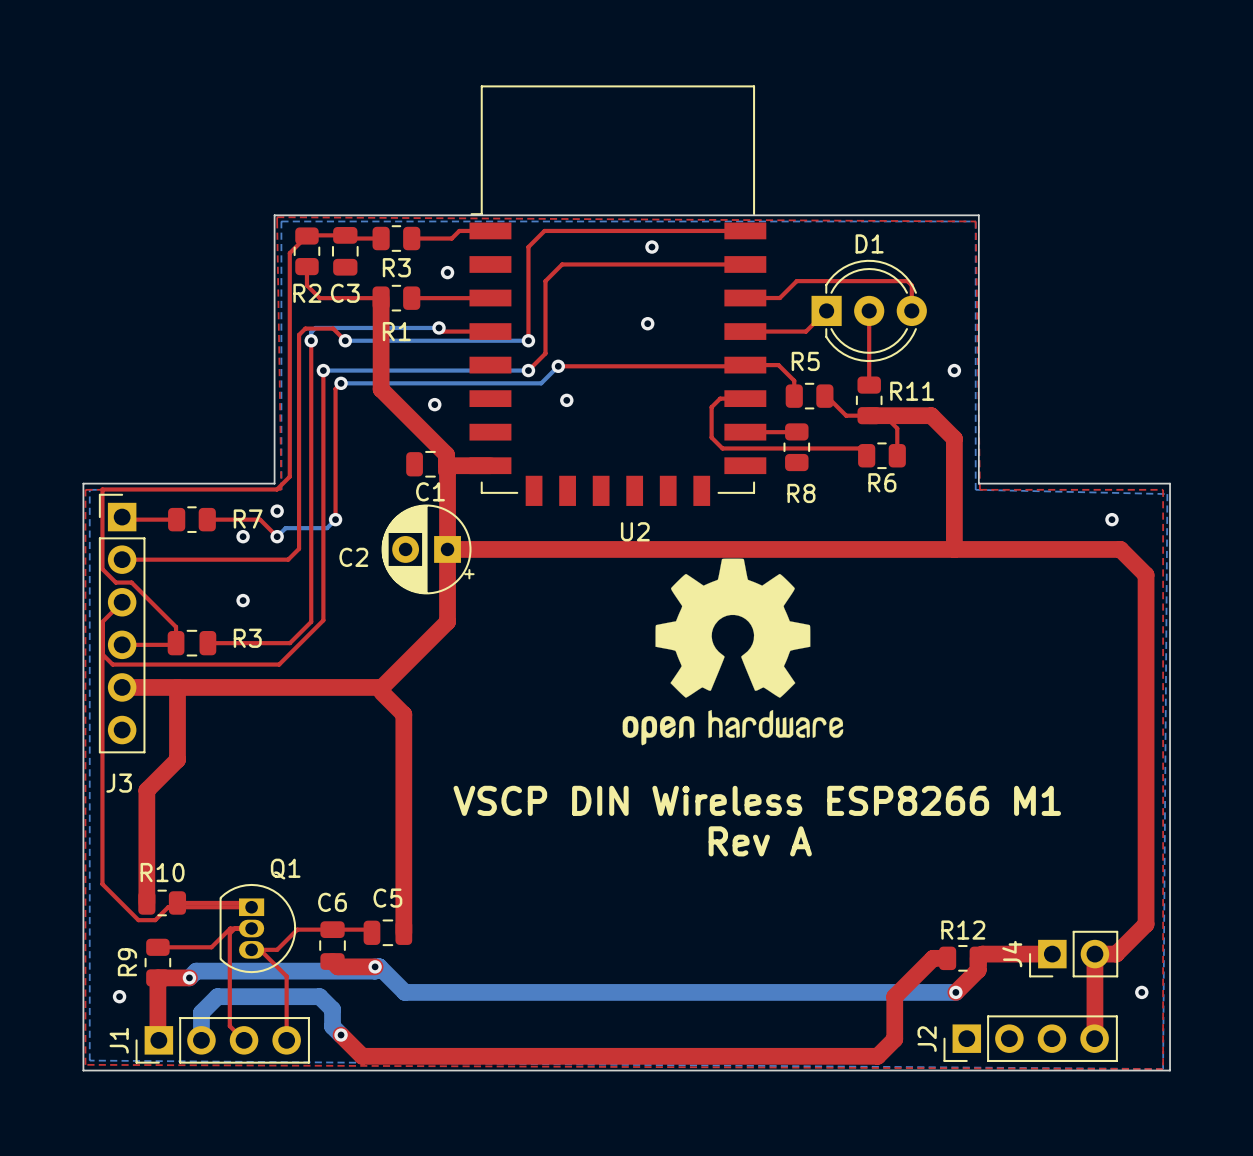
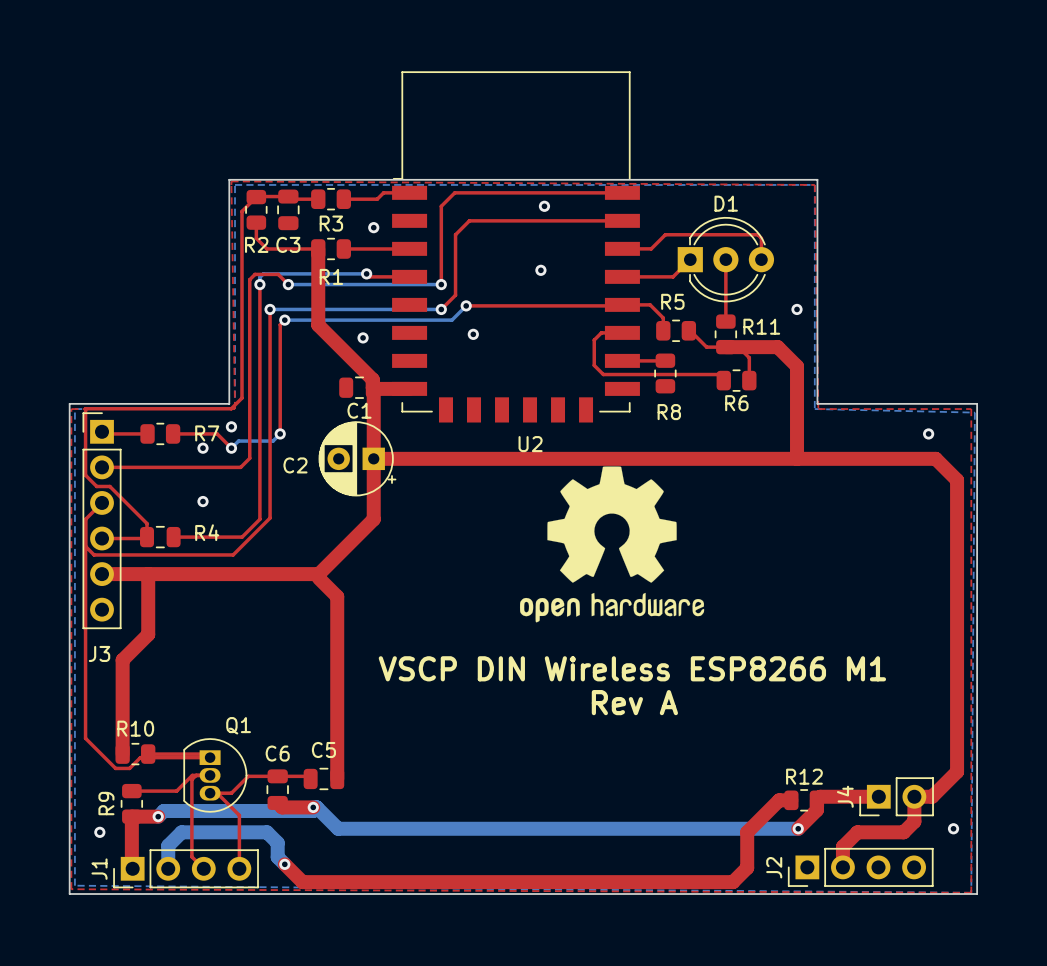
R3 name: R3 (247, 638) -> R4 (207, 532)
top track: (1094, 983) (1094, 1038) -> (914, 821) (903, 832) (857, 832) (842, 846) (842, 867)

